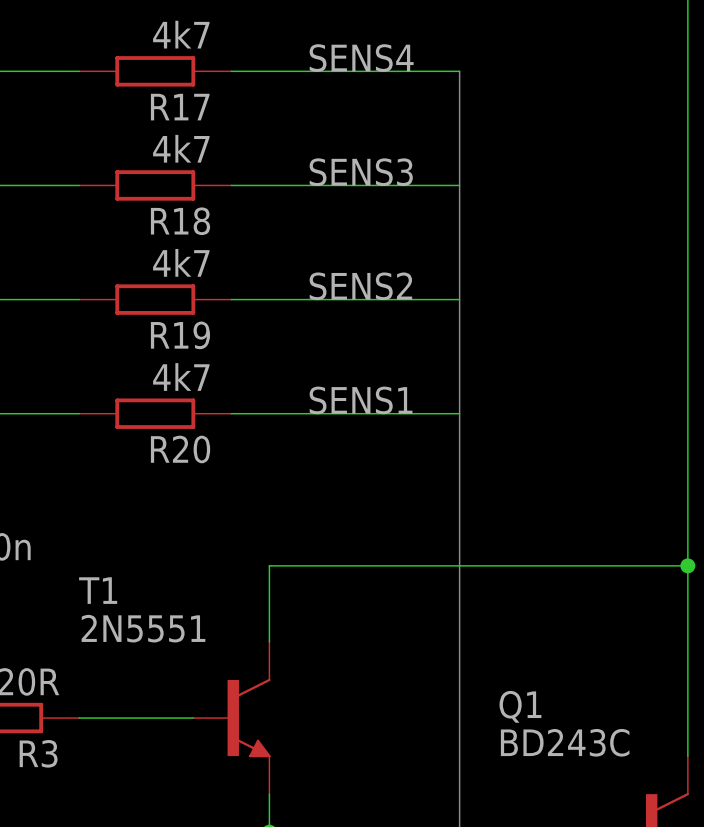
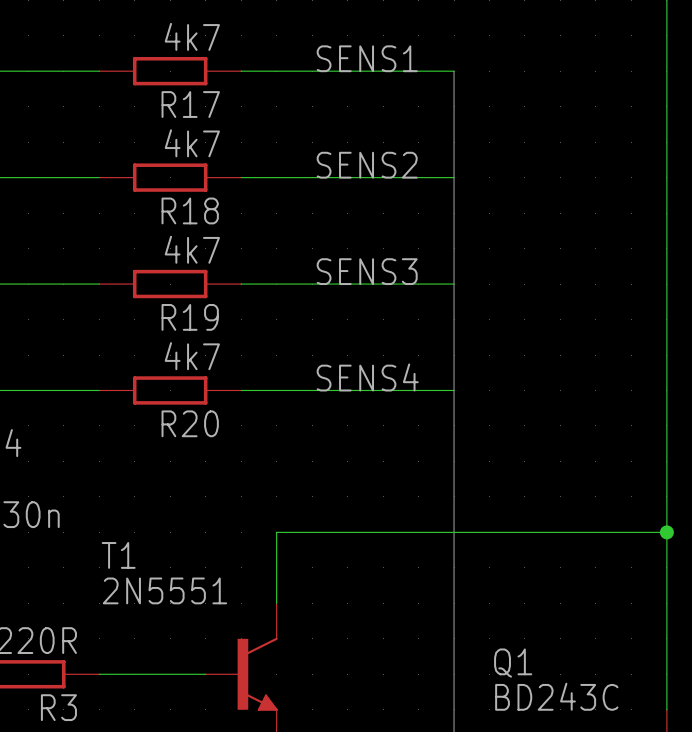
label: SENS4 (361, 58) -> SENS1 (367, 58)
label: SENS3 (361, 172) -> SENS2 (367, 165)
label: SENS2 (360, 286) -> SENS3 (367, 271)
label: SENS1 (361, 400) -> SENS4 (367, 377)

